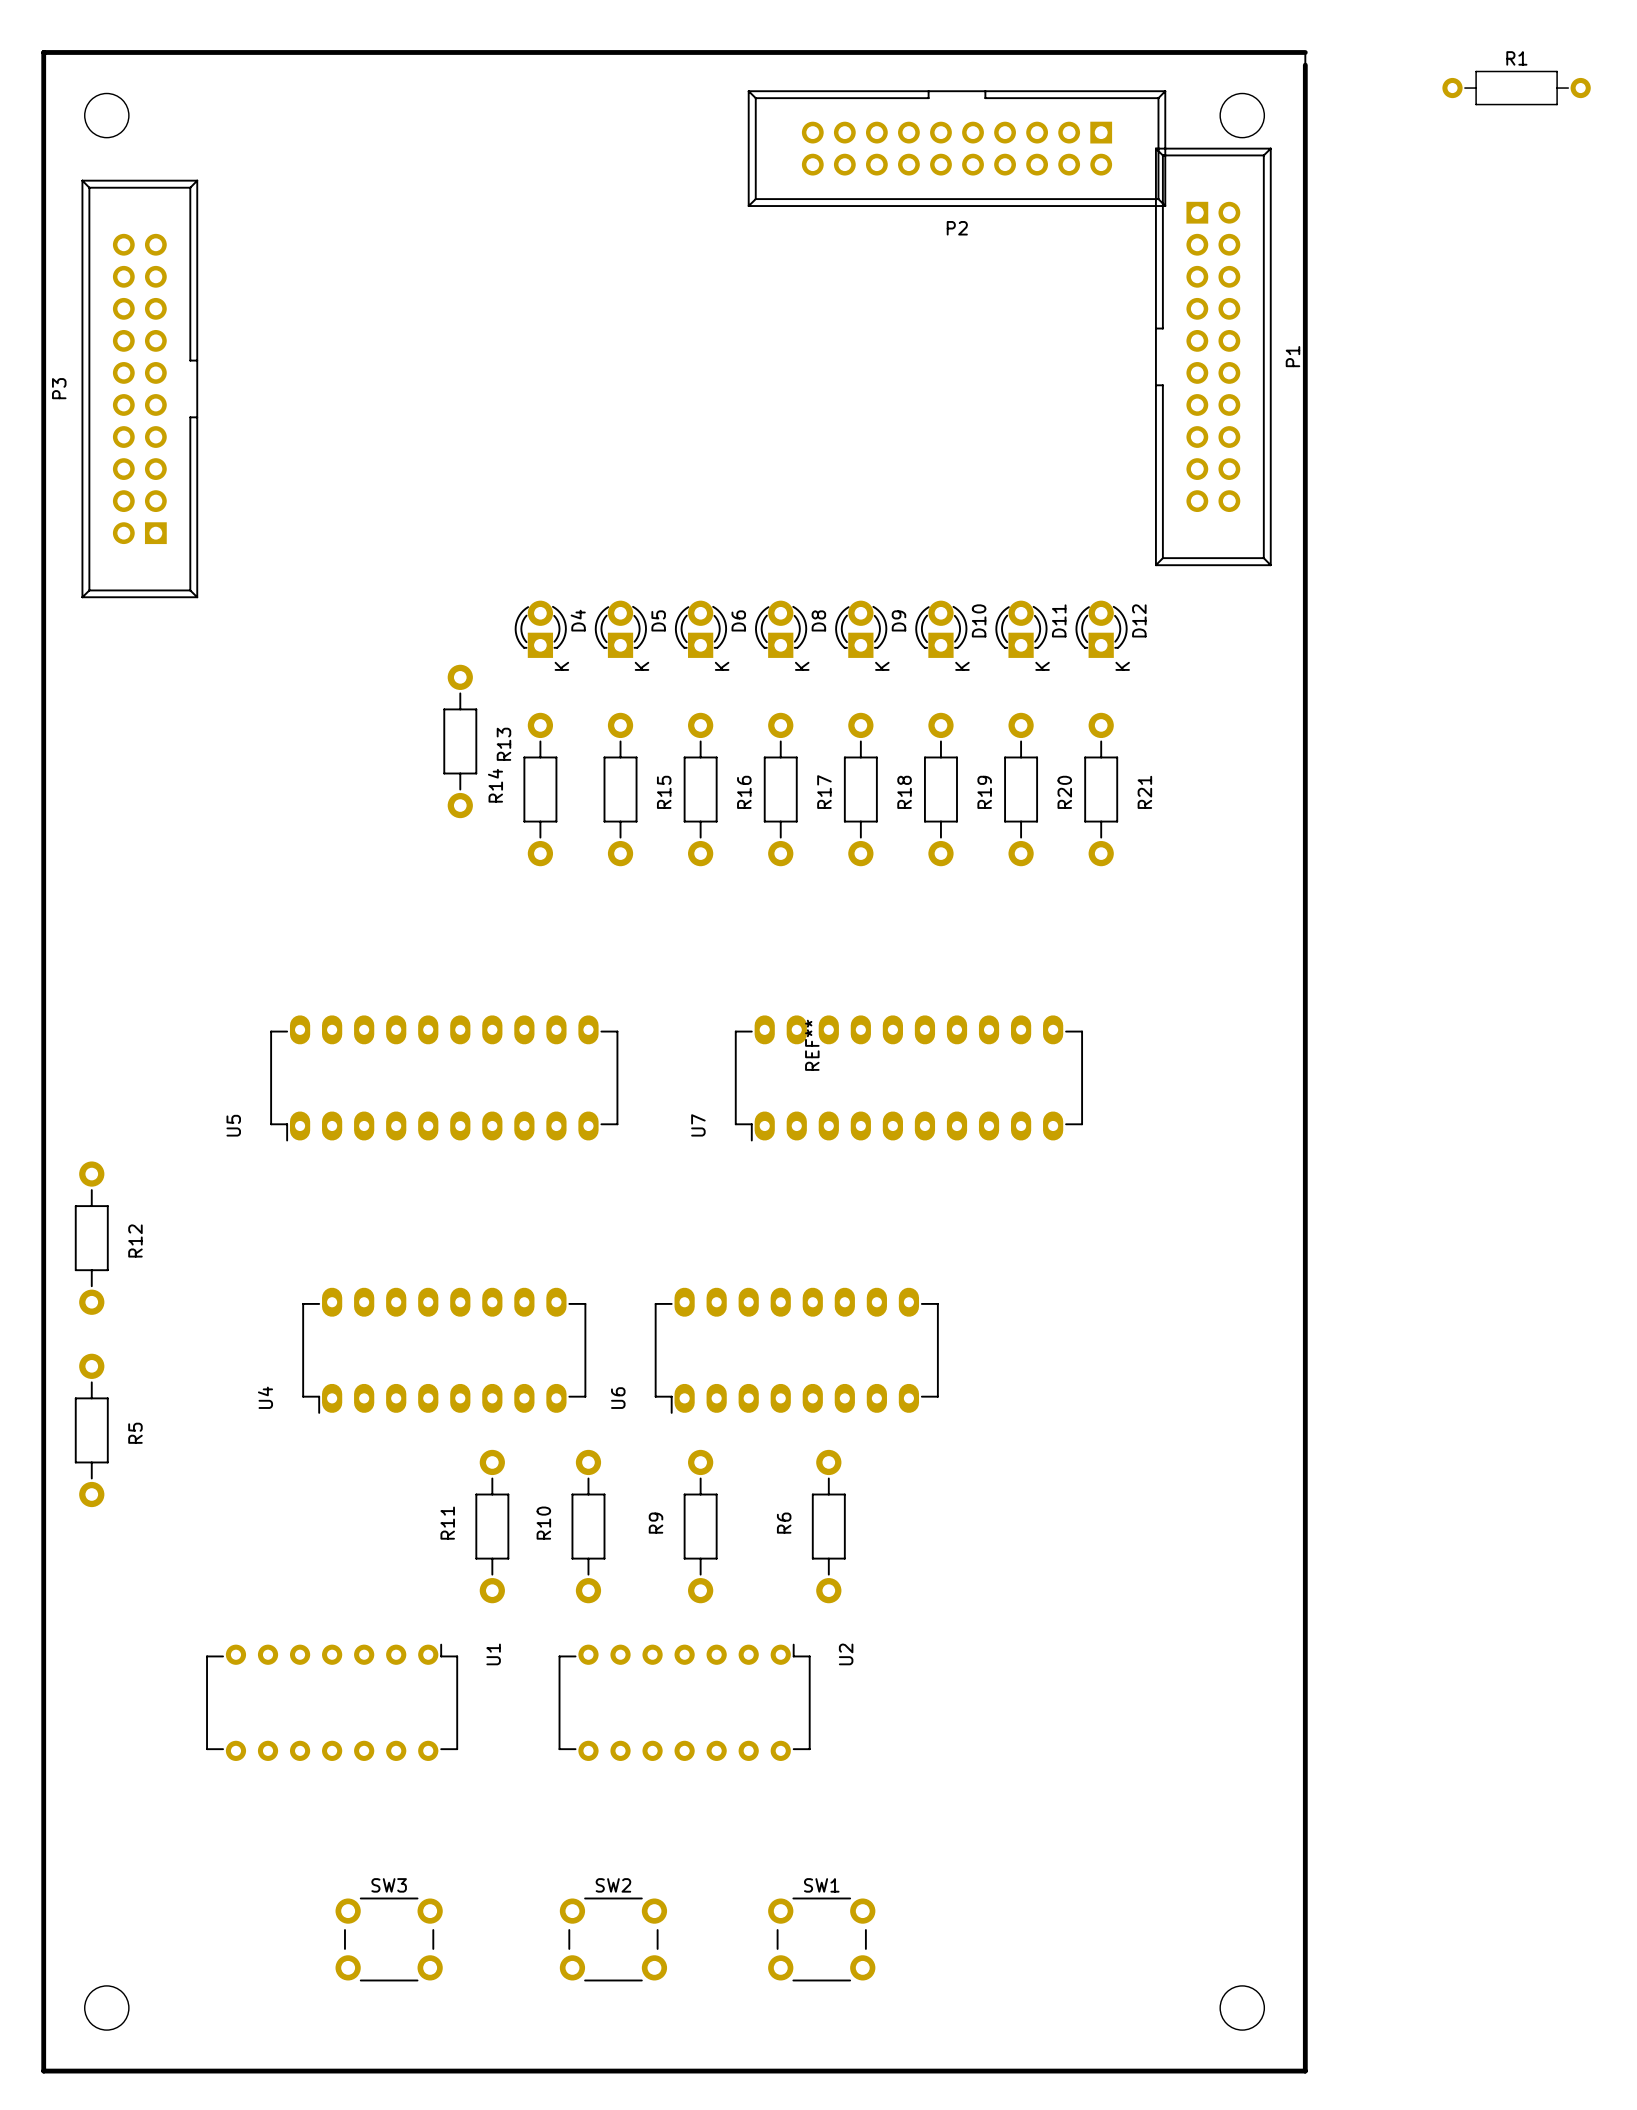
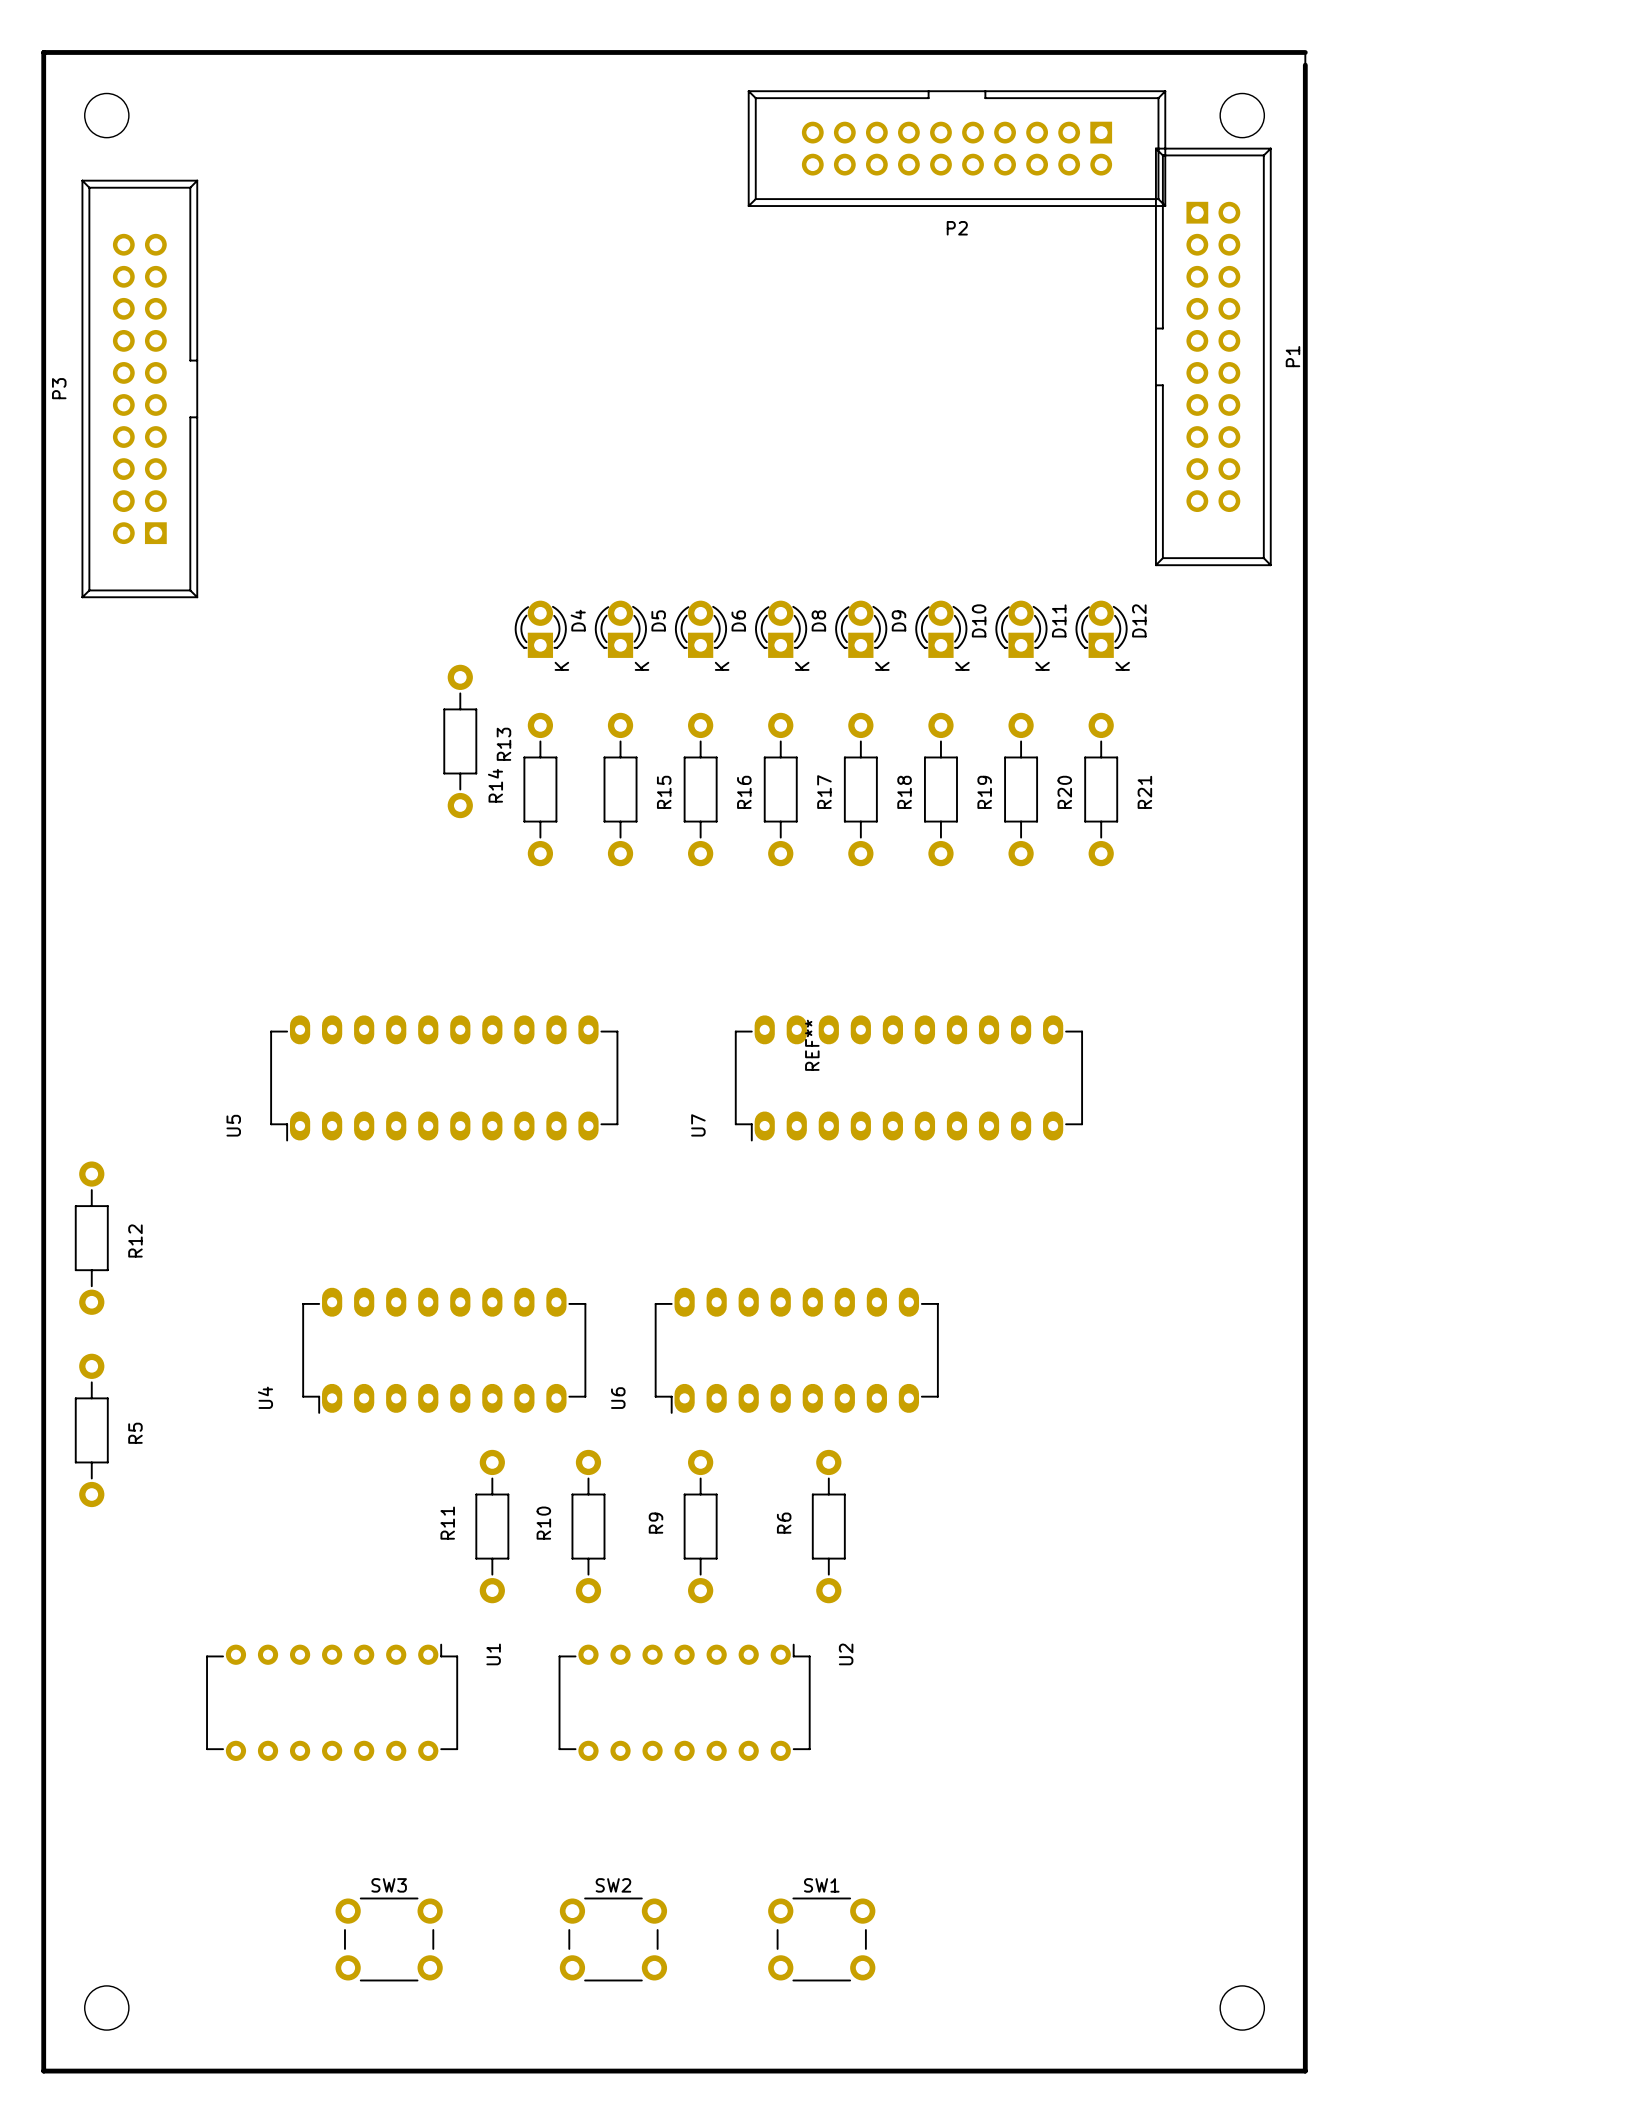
R1: (1516, 88) -> none

